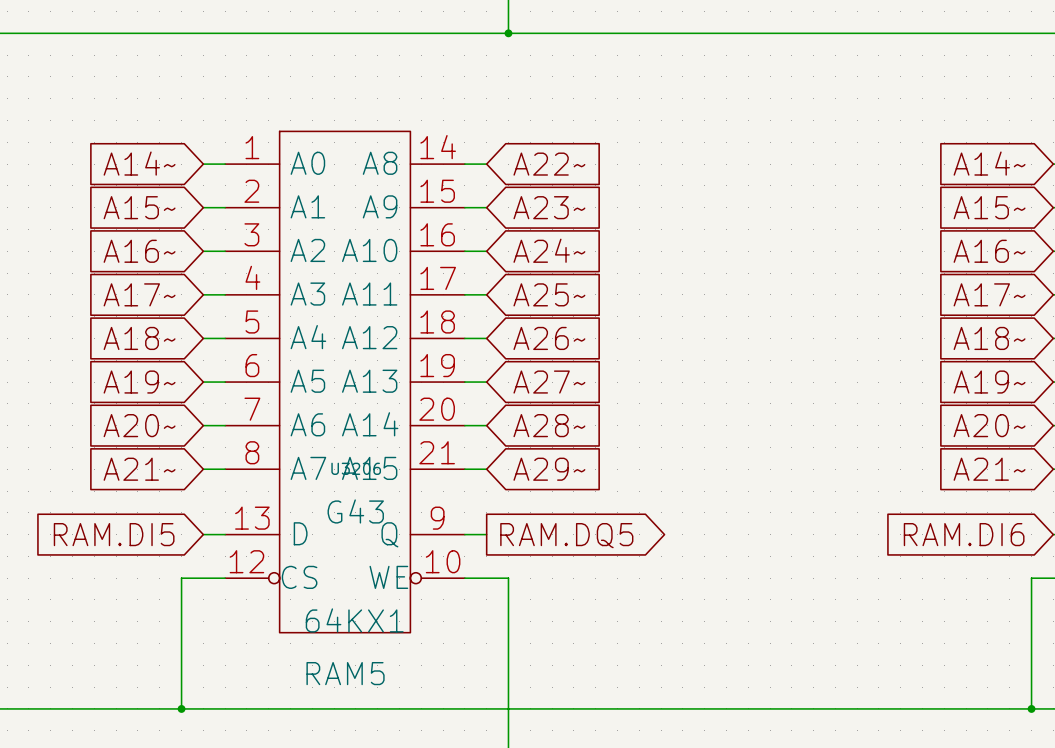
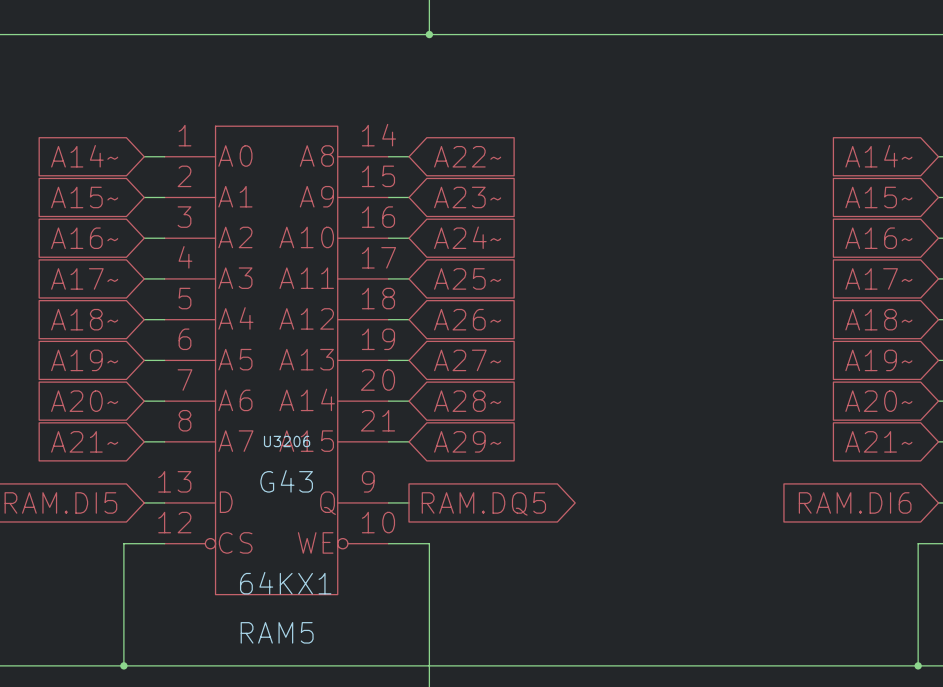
U3206 symbol: [225, 131, 465, 633] -> [164, 126, 389, 595]

